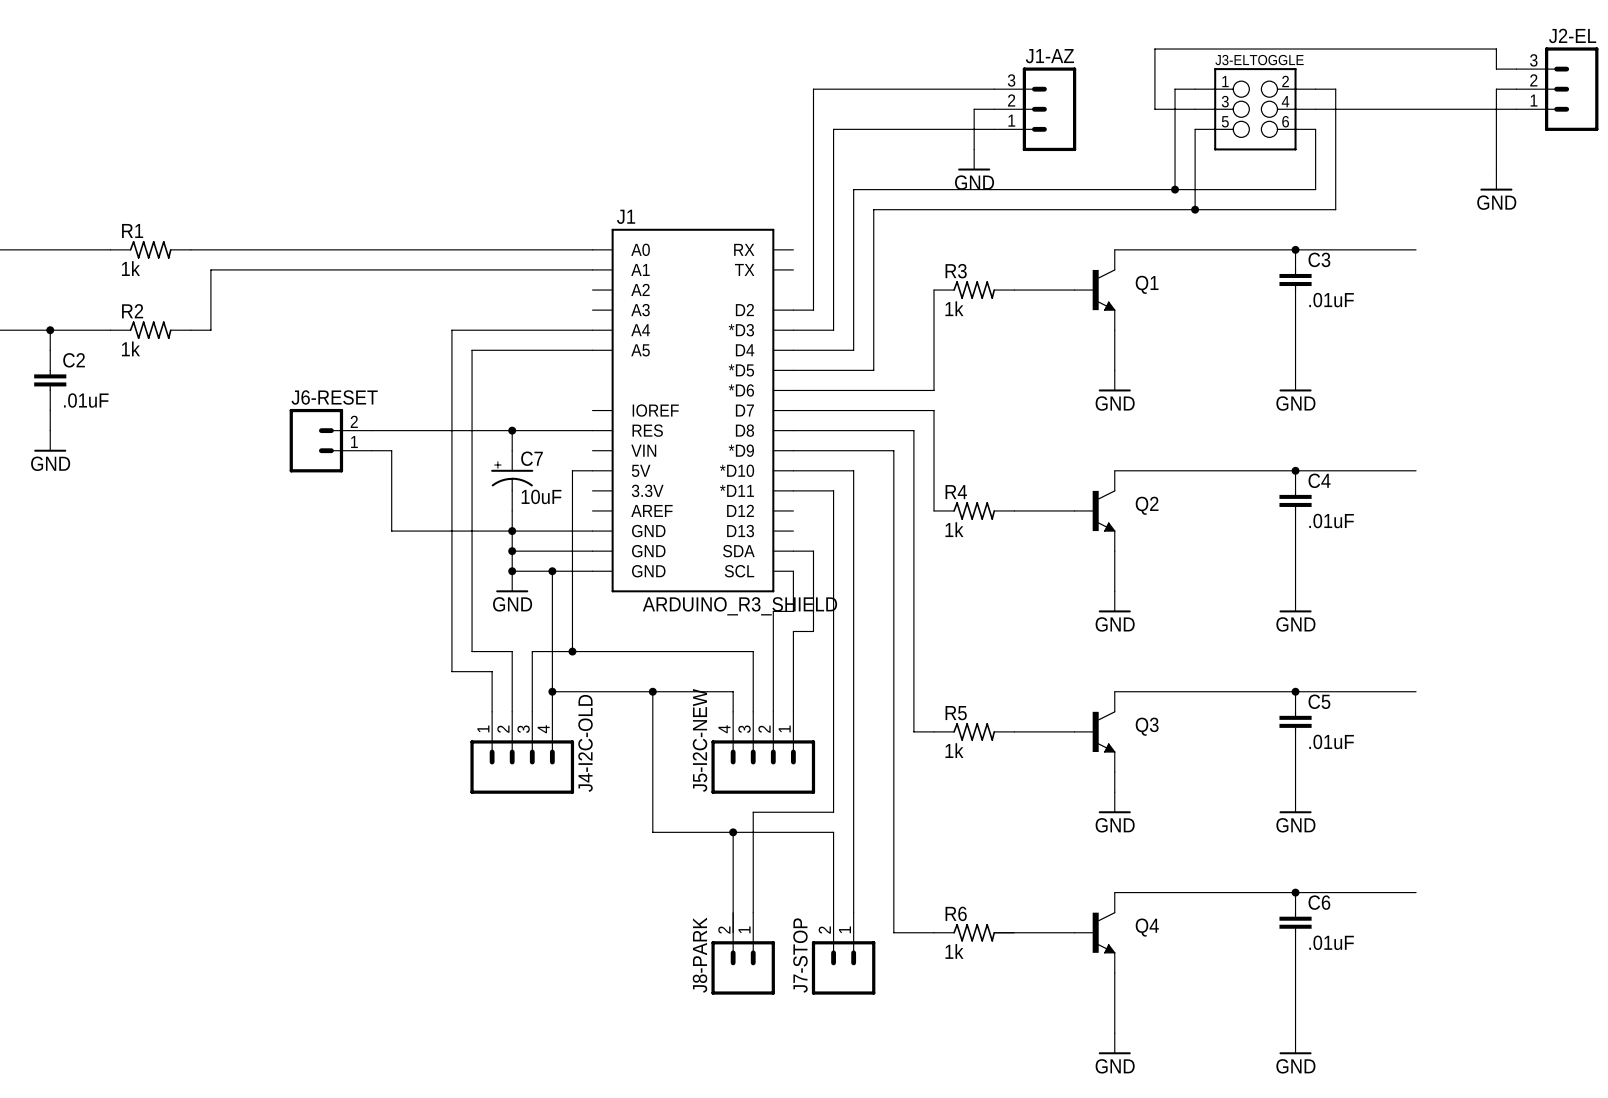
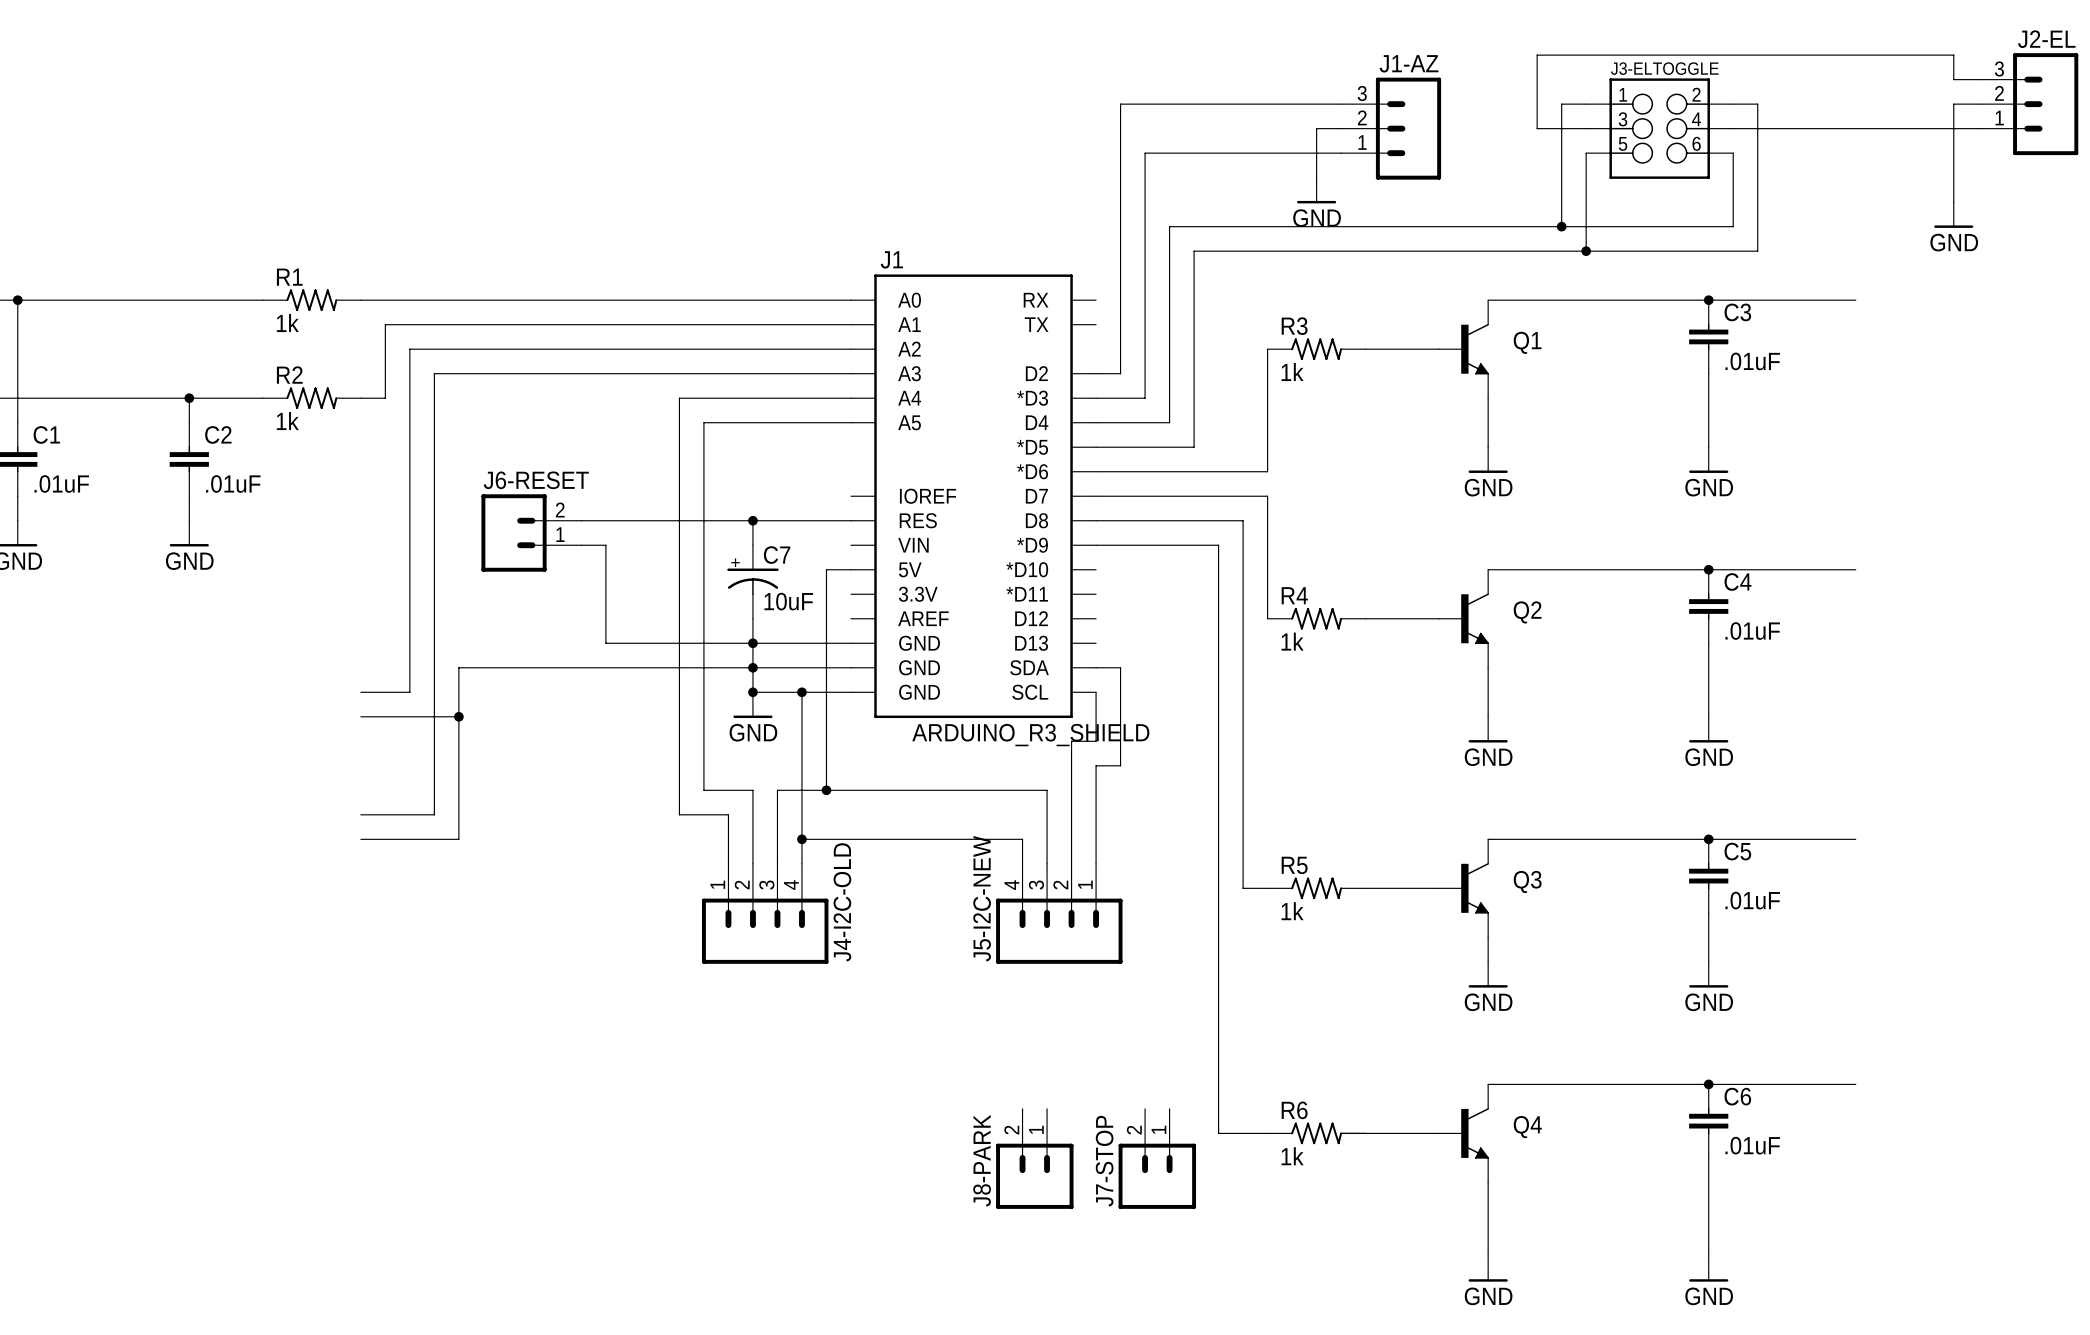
wire: none -> (850, 349) (409, 349) (409, 692) (360, 692)
wire: none -> (850, 373) (434, 373) (434, 814) (360, 814)
wire: (793, 470) (853, 470) (853, 912) -> none
wire: (793, 490) (833, 490) (833, 812) (753, 812) (753, 912) -> none
wire: none -> (752, 667) (458, 667) (458, 839) (360, 839)
wire: none -> (360, 716) (458, 716)
junction: none -> (458, 716)
wire: (652, 691) (652, 832) (833, 832) (833, 912) -> none
junction: (652, 691) -> none
wire: (733, 832) (733, 932) -> none
junction: (733, 832) -> none

